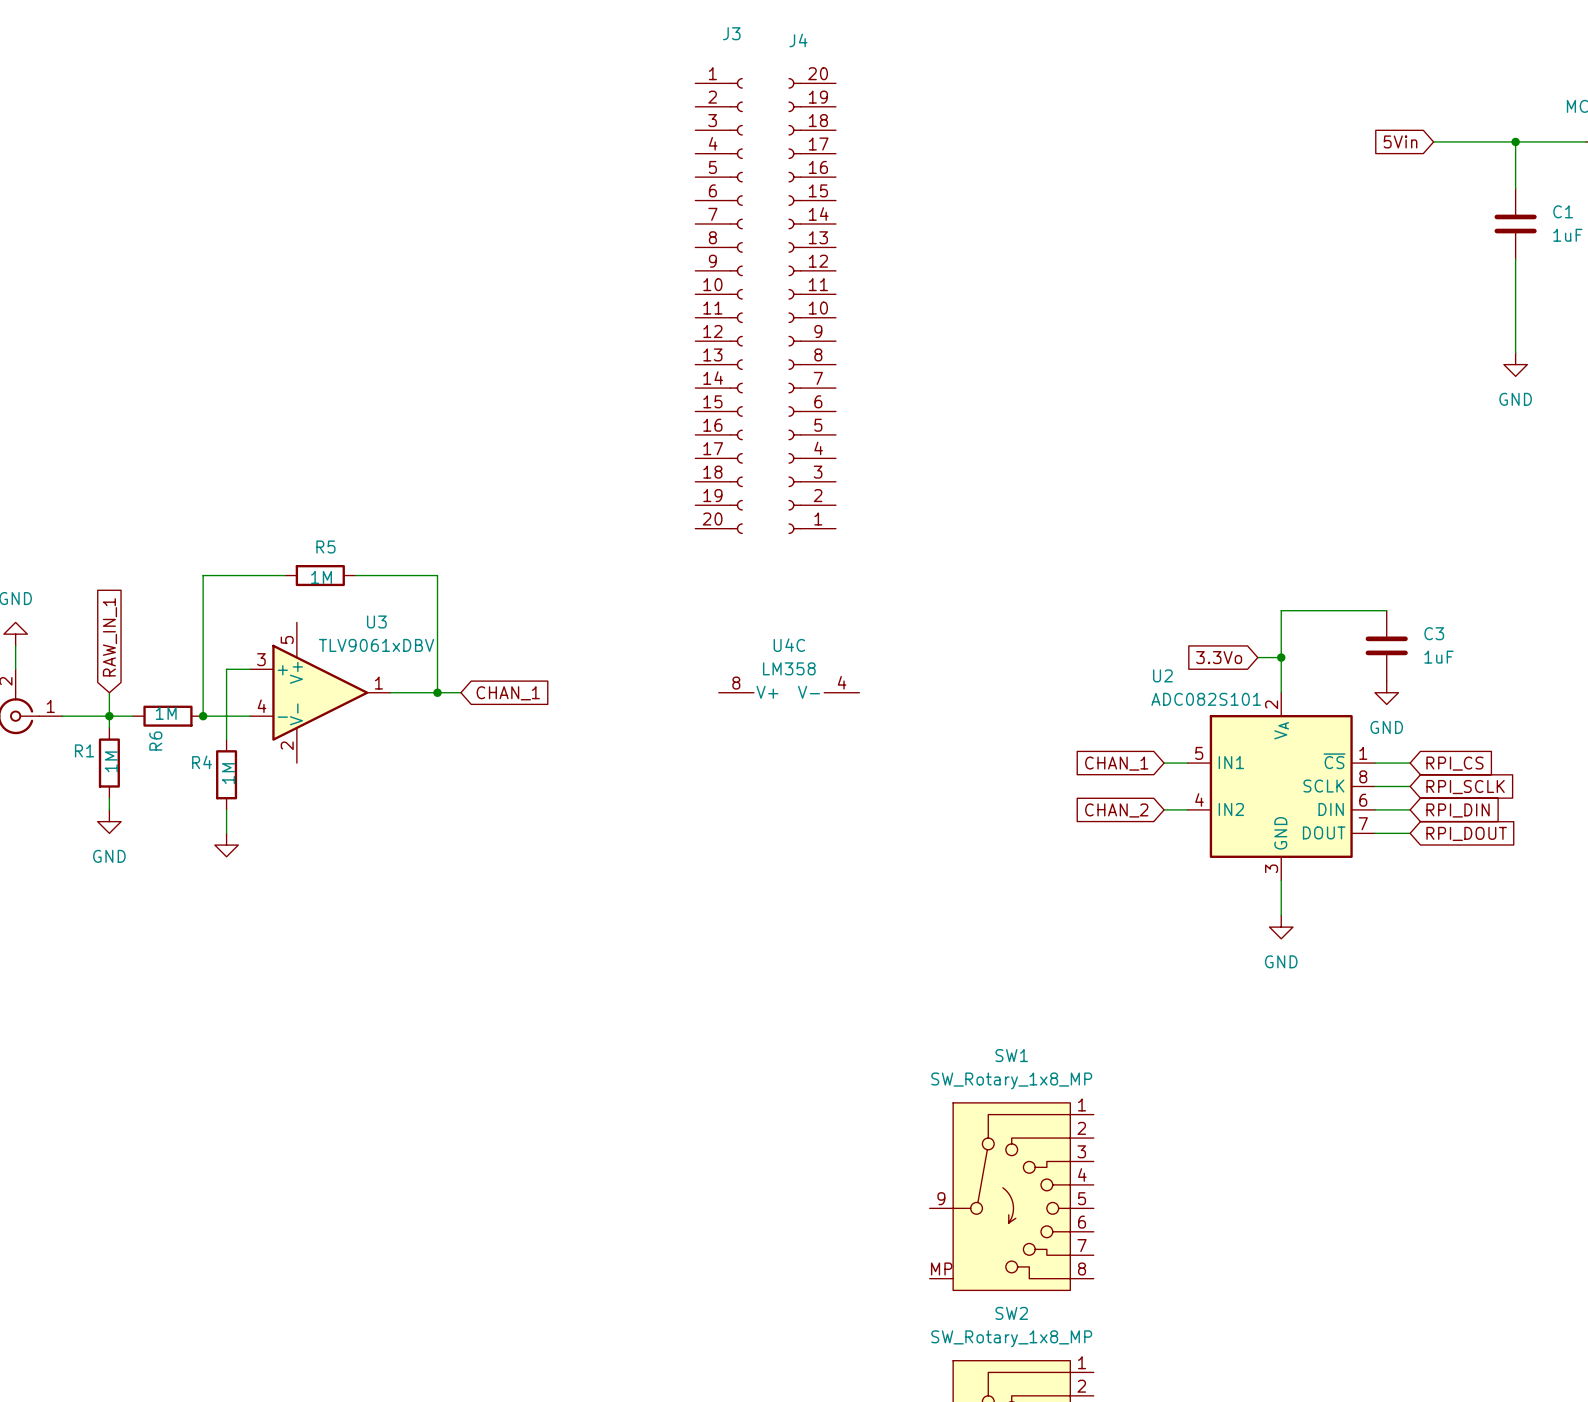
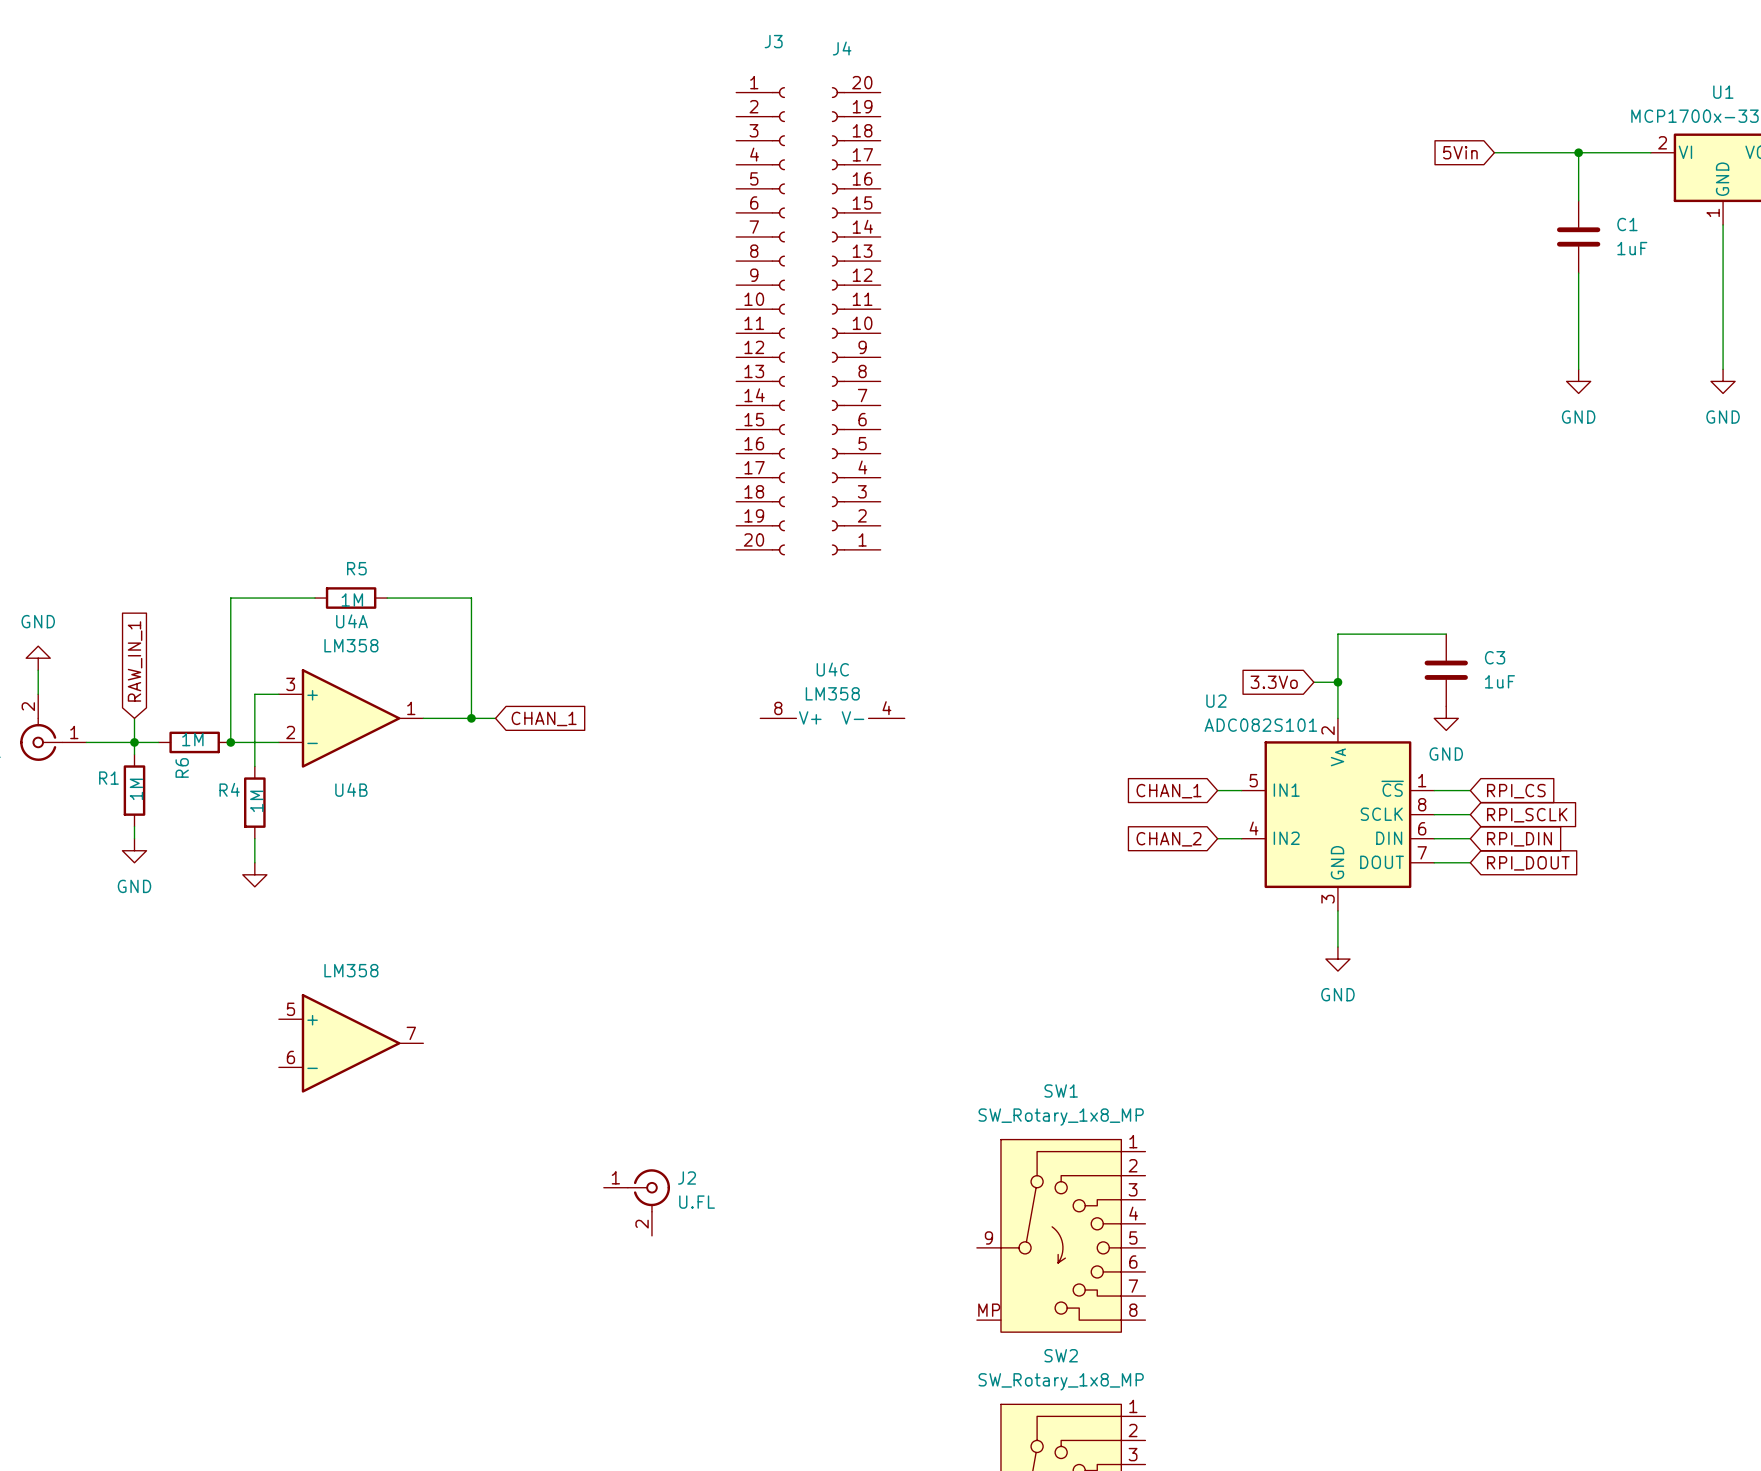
U3: TLV9061xDBV (320, 692) -> none
U4A: none -> LM358 (351, 718)
U4B: none -> LM358 (351, 1043)
J2: none -> U.FL (636, 1202)

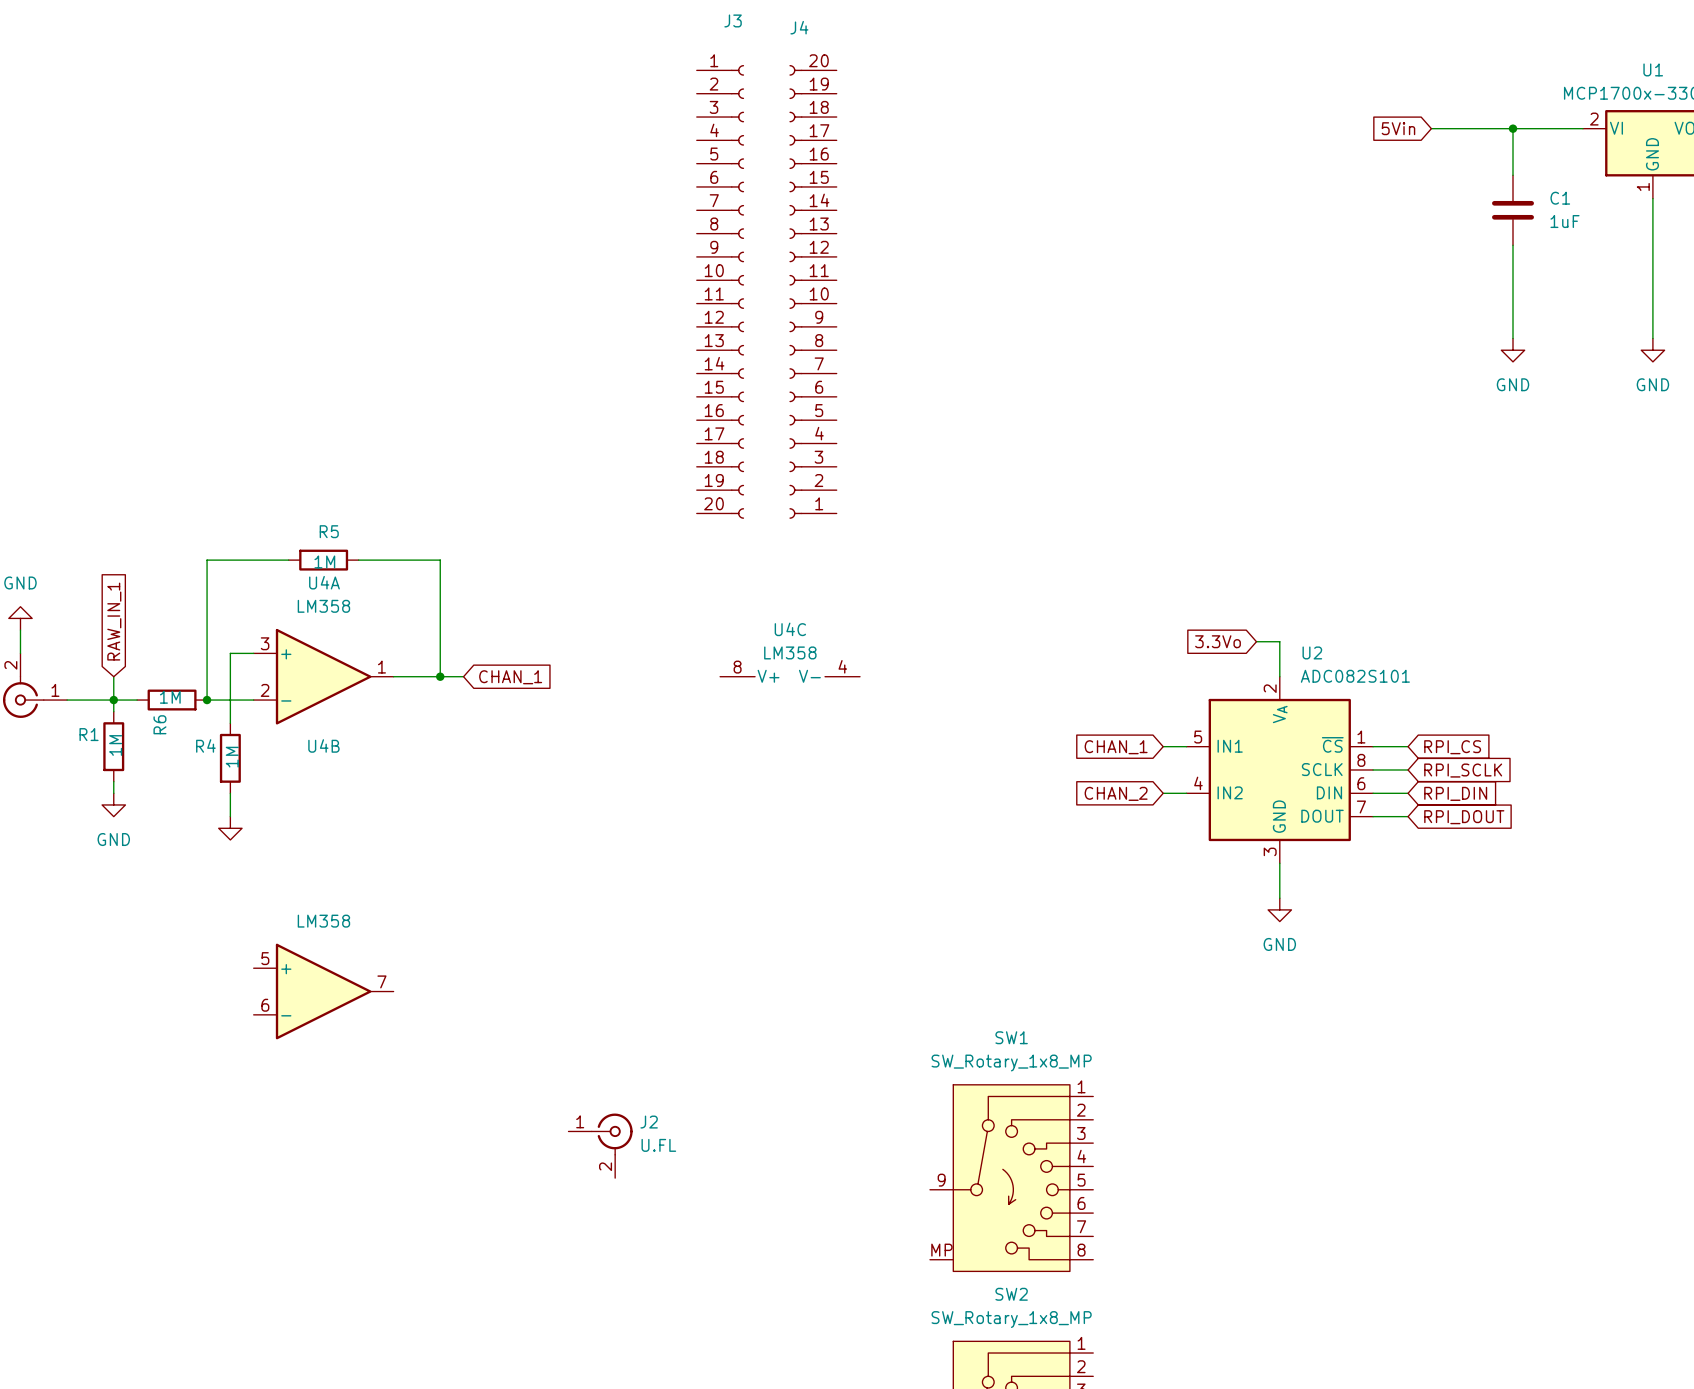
wire: (1446, 634) (1337, 634) (1337, 682) -> none
C3: 1uF (1446, 670) -> none
junction: (1337, 682) -> none
U2 name position: U2 (1216, 701) -> U2 (1312, 652)
power symbol: GND (1446, 718) -> none
U2 value position: ADC082S101 (1260, 725) -> ADC082S101 (1355, 676)

